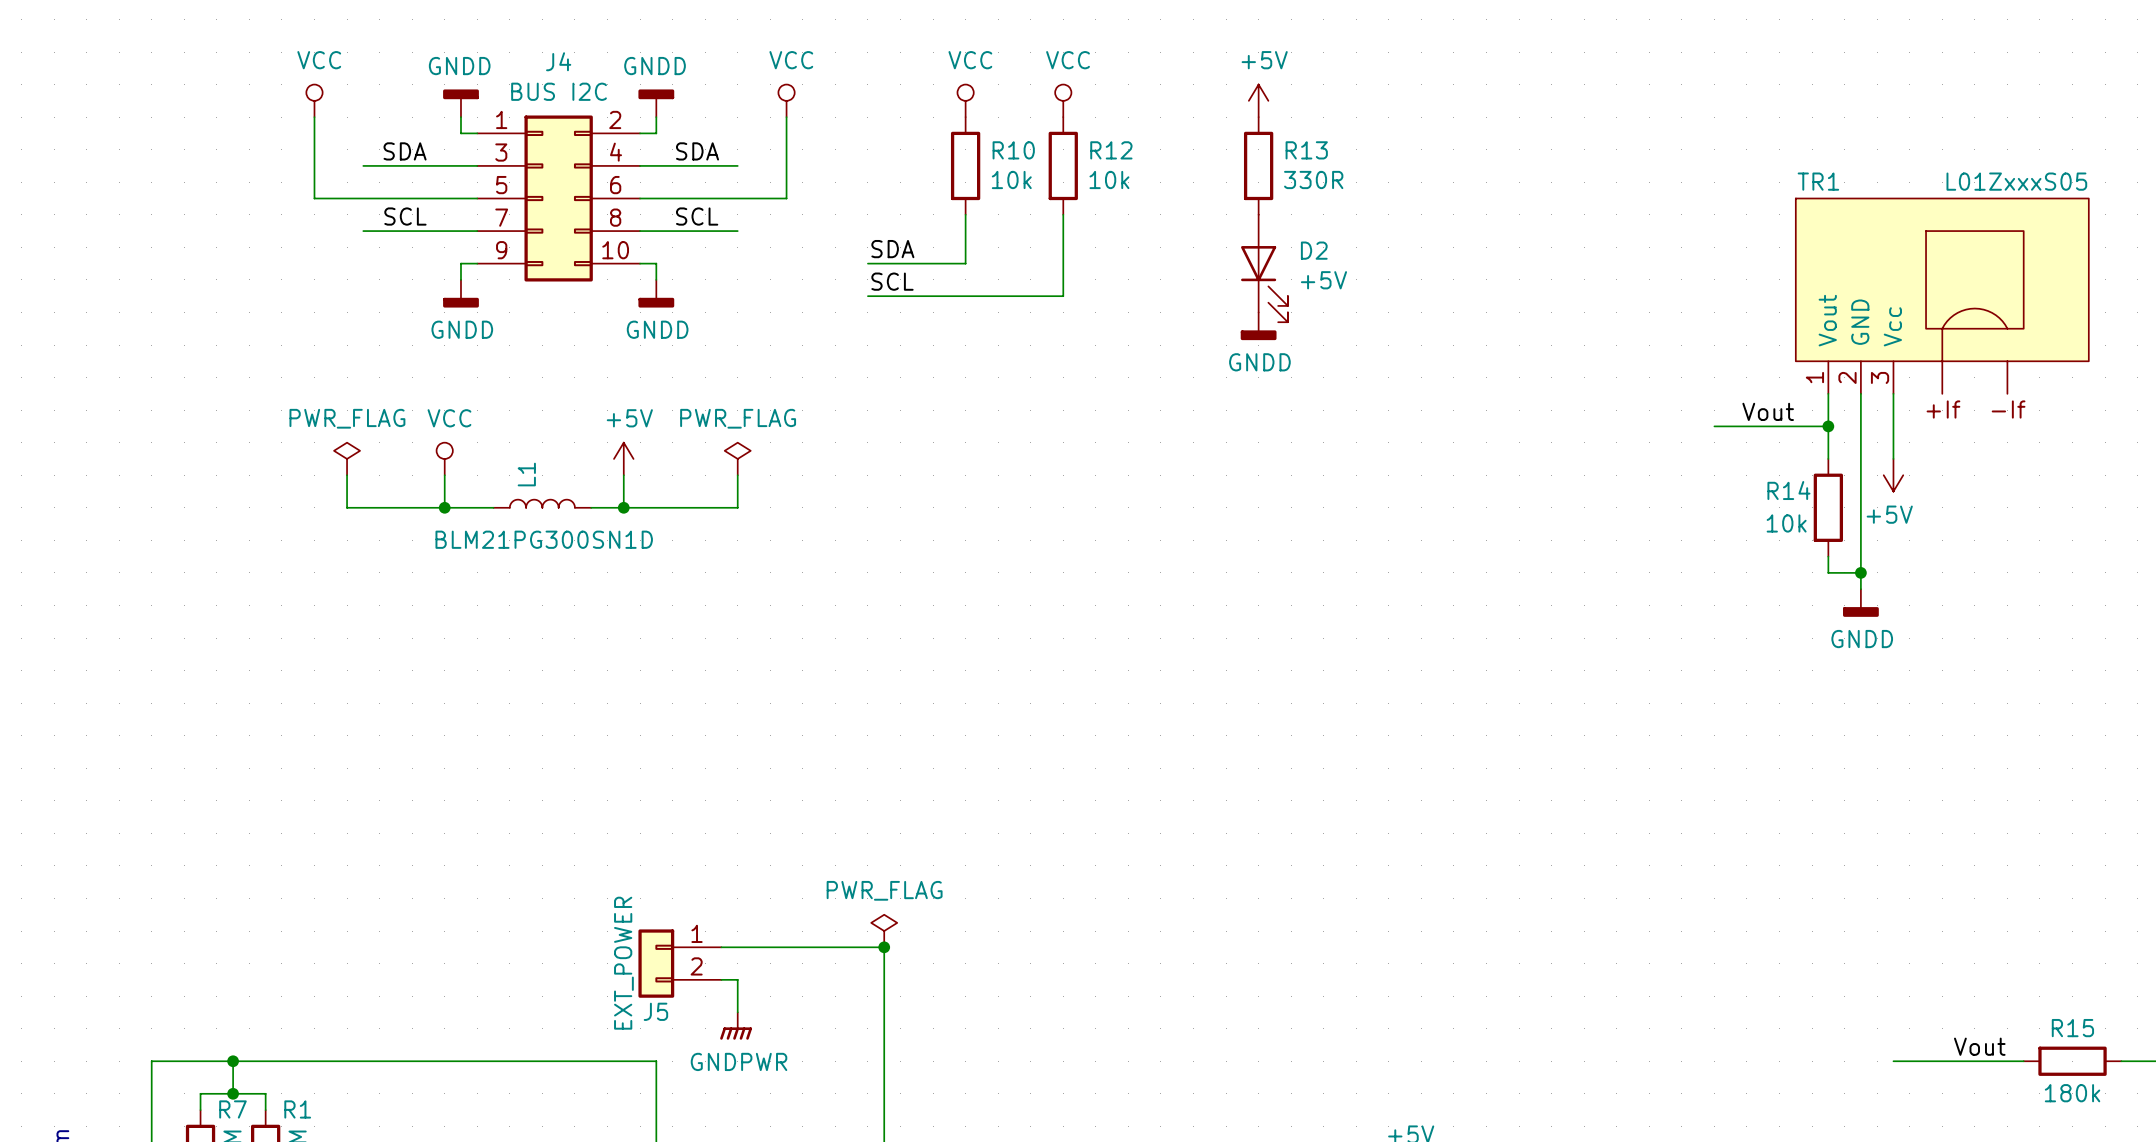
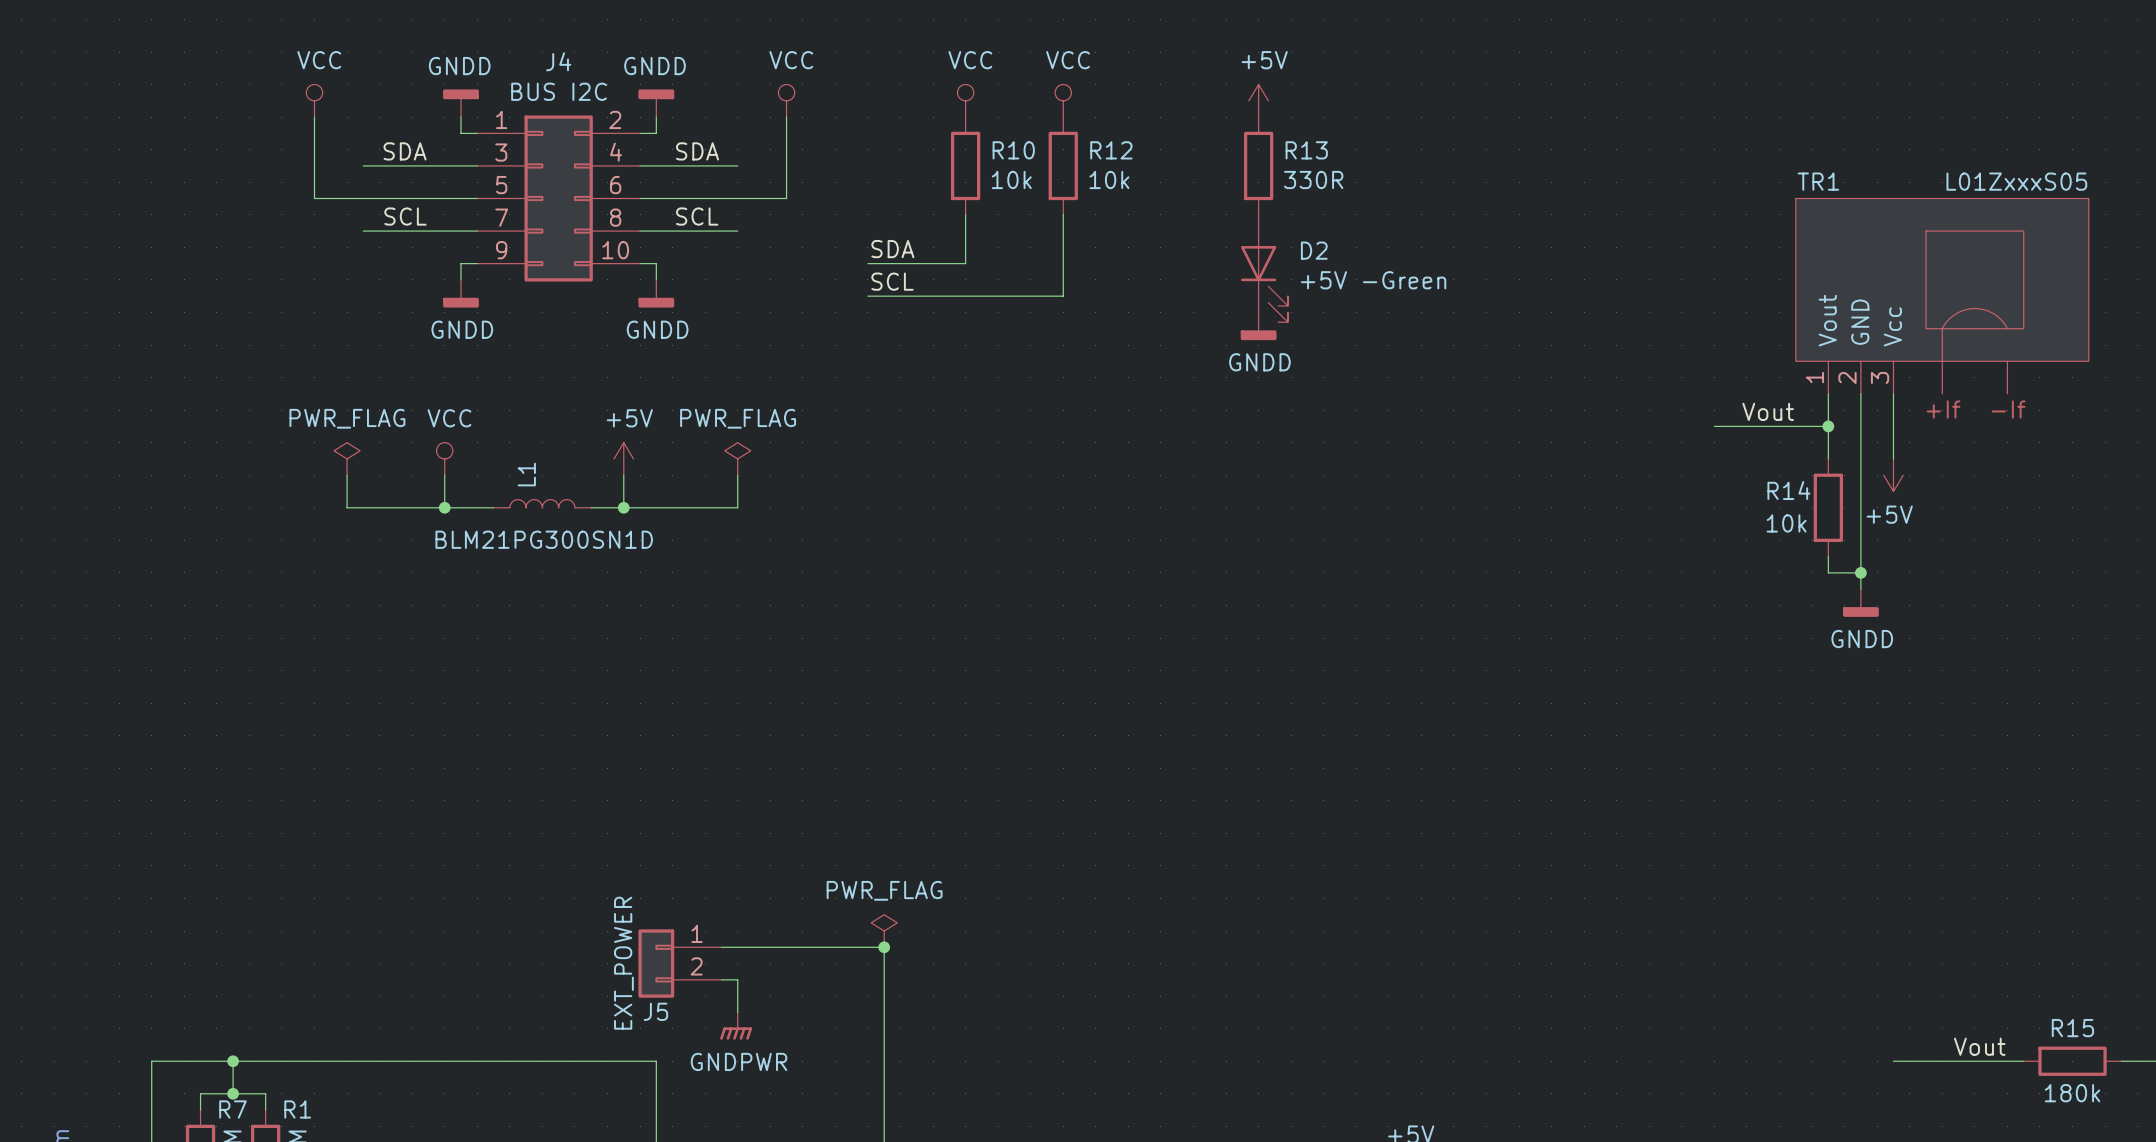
D2 value: +5V (1323, 280) -> +5V -Green (1373, 280)

